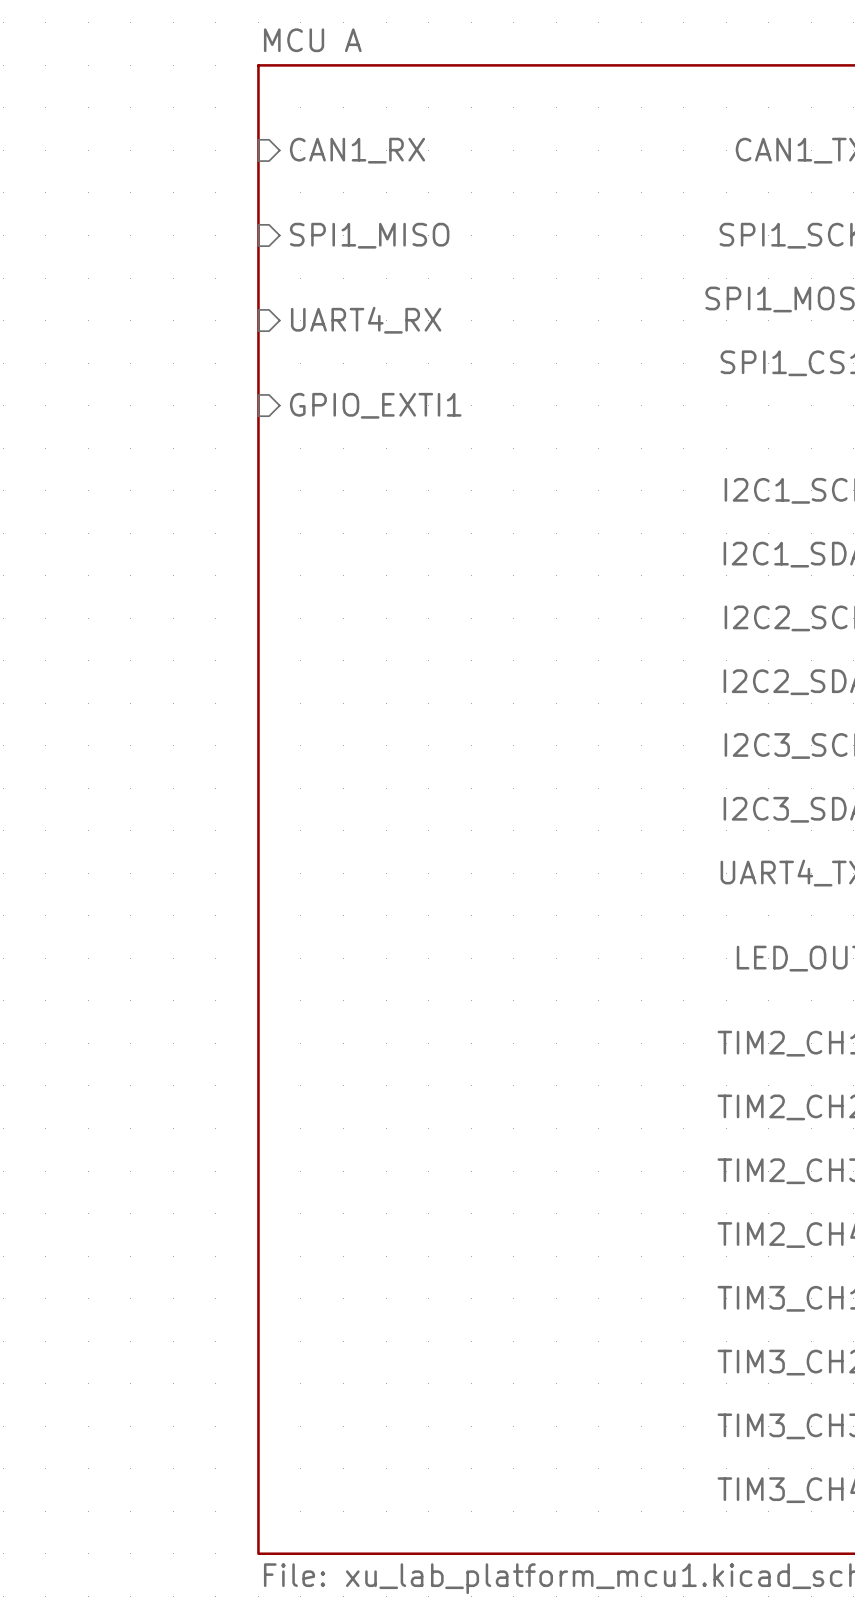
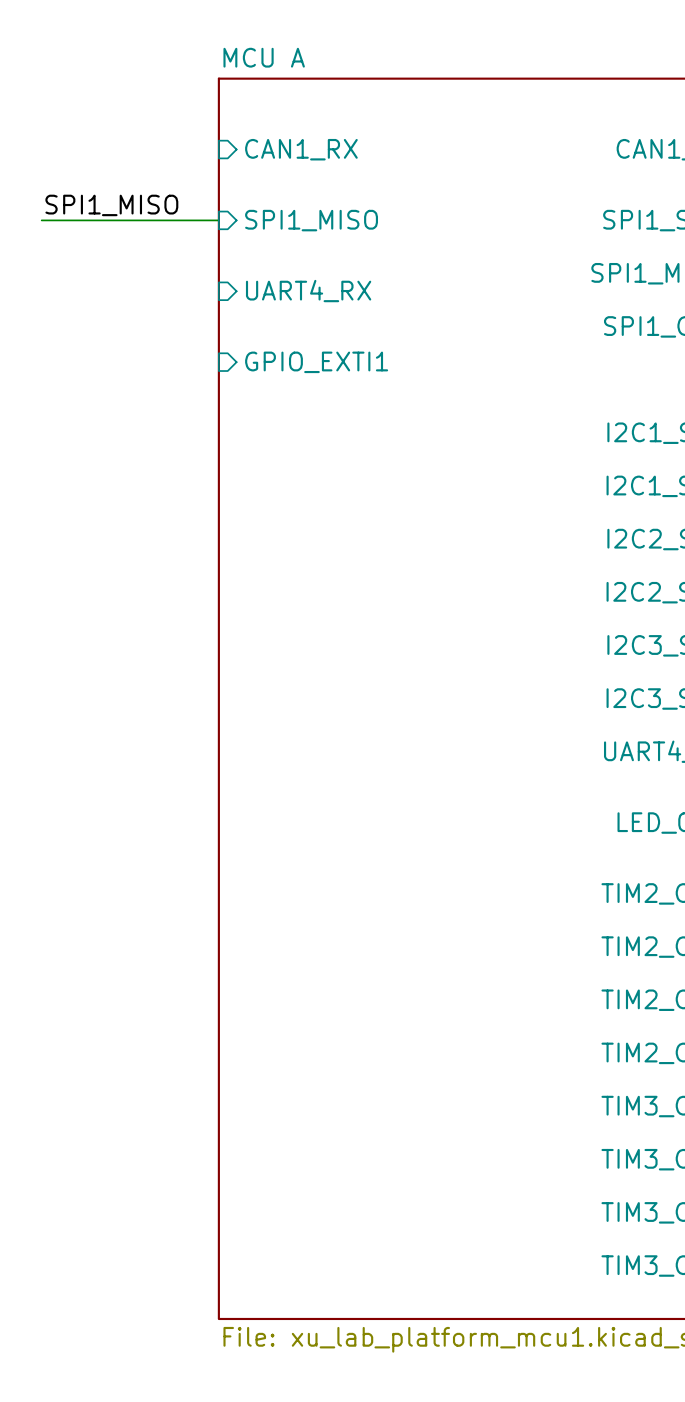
label: none -> SPI1_MISO (111, 205)
wire: none -> (41, 220) (218, 220)

